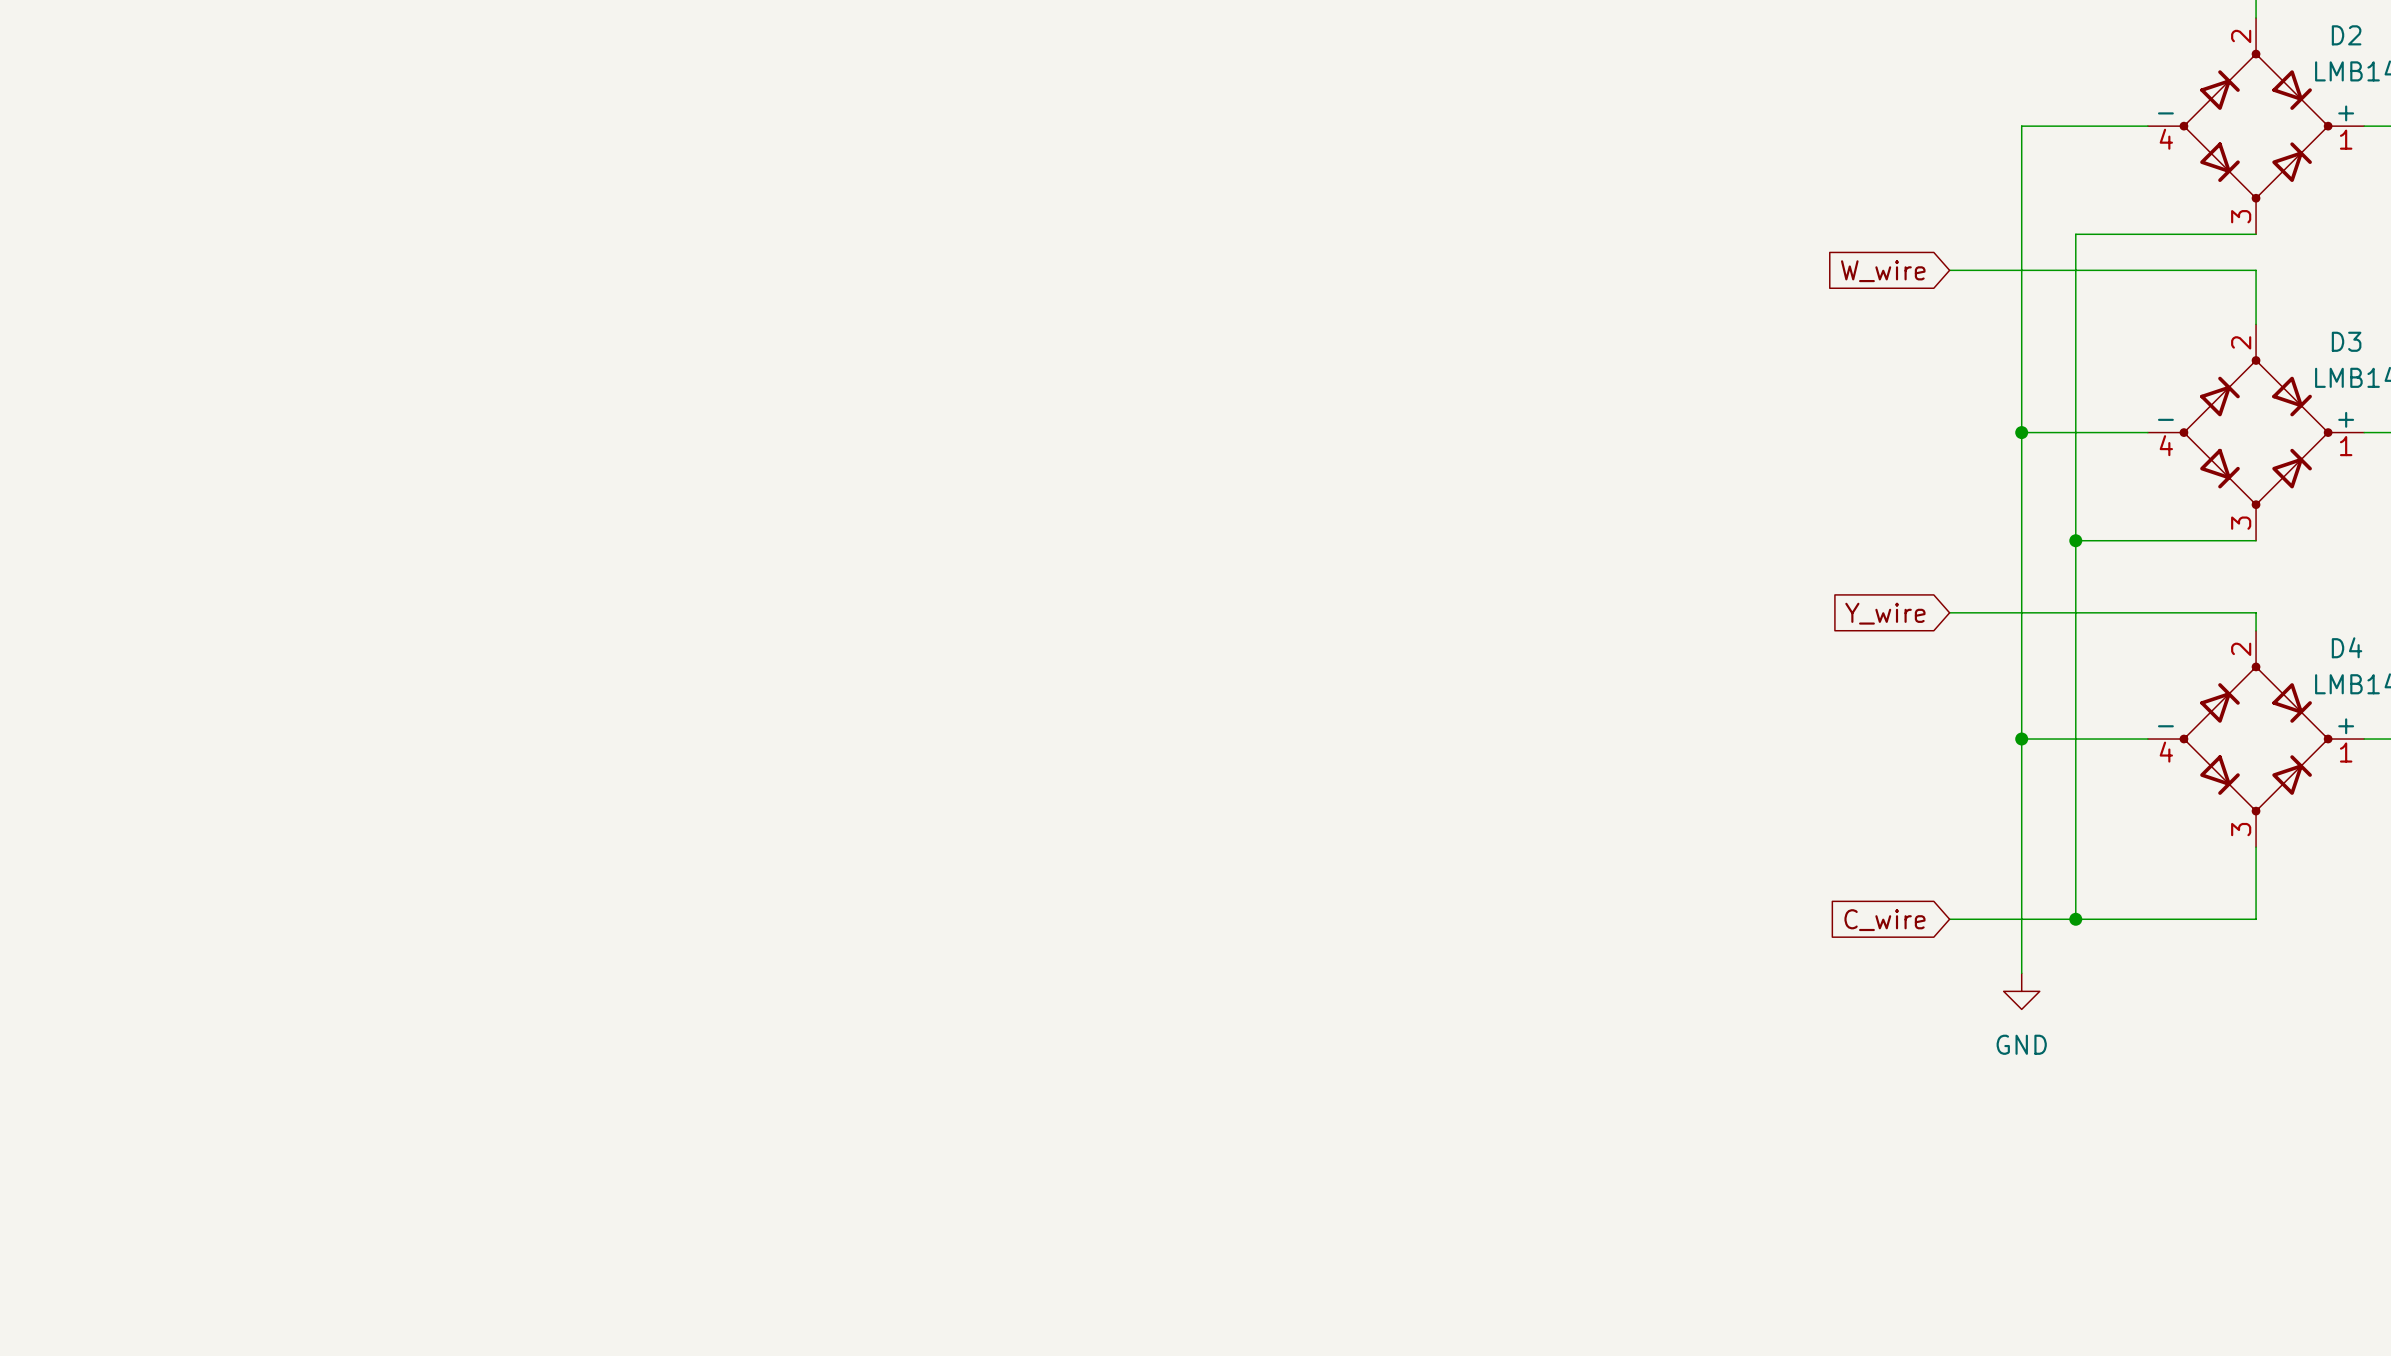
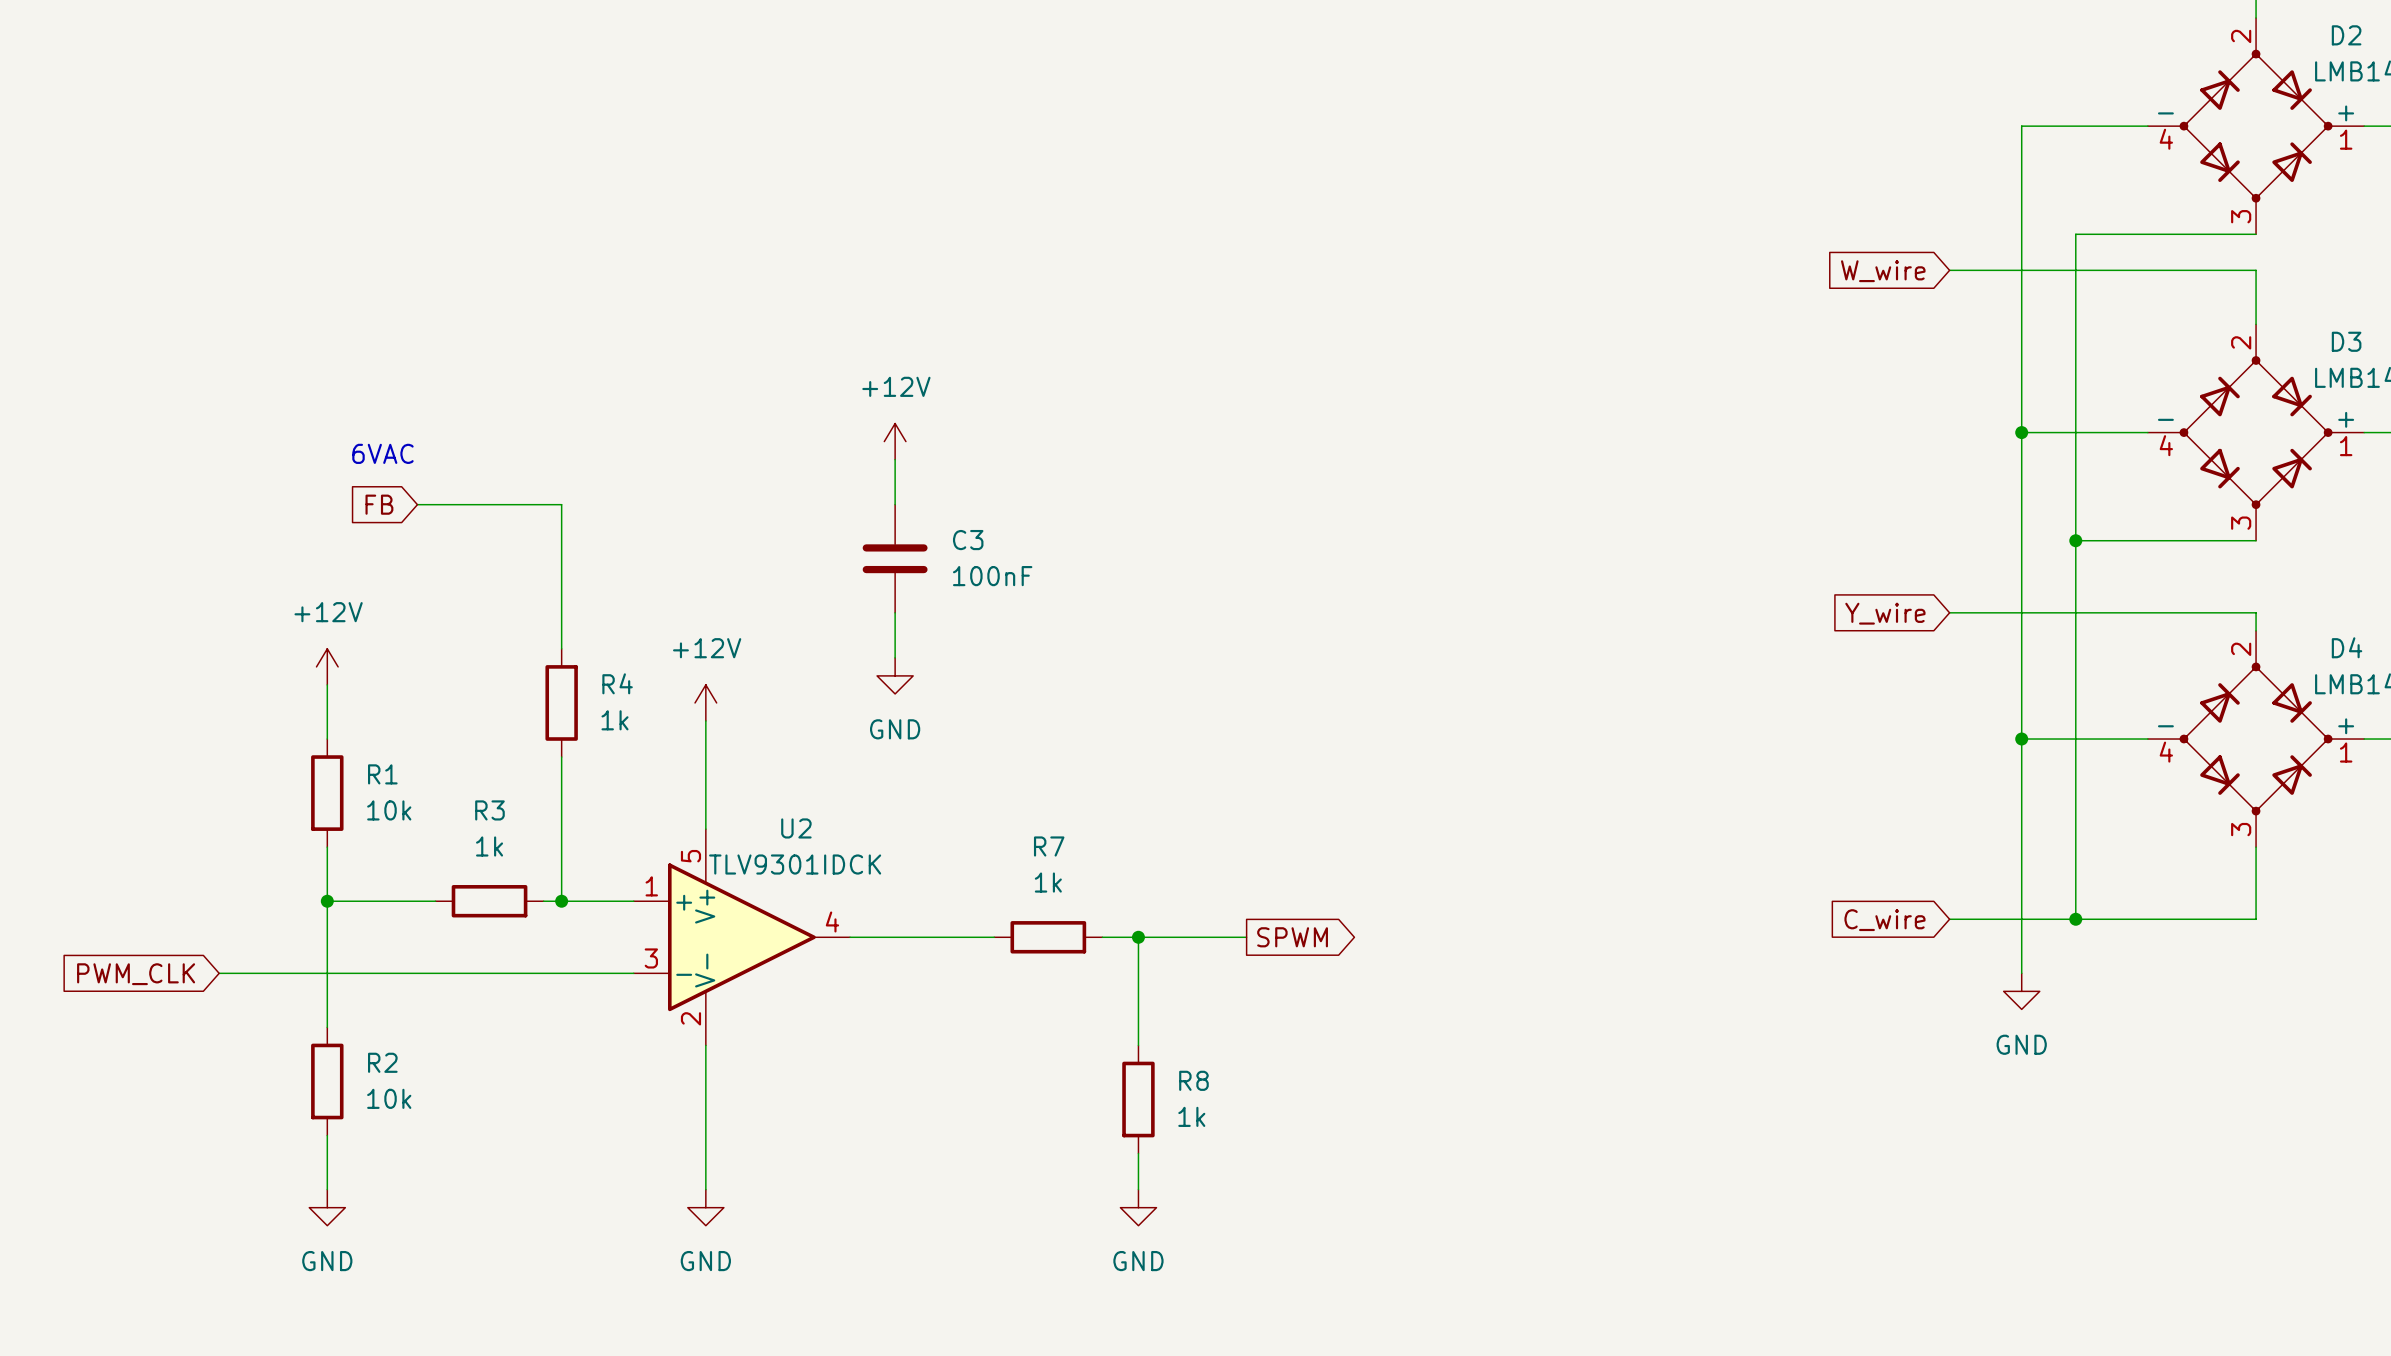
power symbol: none -> +12V (895, 441)
text: none -> 6VAC (382, 453)
wire: none -> (895, 459) (895, 504)
global label: none -> FB (379, 504)
wire: none -> (417, 504) (561, 504) (561, 648)
C3: none -> 100nF (895, 558)
wire: none -> (895, 612) (895, 657)
power symbol: none -> +12V (327, 666)
power symbol: none -> GND (895, 675)
wire: none -> (327, 684) (327, 739)
R4: none -> 1k (561, 702)
power symbol: none -> +12V (705, 702)
wire: none -> (705, 720) (705, 829)
wire: none -> (561, 757) (561, 901)
R1: none -> 10k (327, 793)
wire: none -> (327, 847) (327, 1027)
wire: none -> (327, 901) (435, 901)
junction: none -> (327, 901)
R3: none -> 1k (489, 901)
wire: none -> (543, 901) (633, 901)
junction: none -> (561, 901)
U2: none -> TLV9301IDCK (741, 937)
wire: none -> (850, 937) (994, 937)
R7: none -> 1k (1048, 937)
wire: none -> (1102, 937) (1246, 937)
wire: none -> (1138, 937) (1138, 1045)
junction: none -> (1138, 937)
global label: none -> SPWM (1292, 937)
wire: none -> (219, 973) (633, 973)
global label: none -> PWM_CLK (136, 974)
wire: none -> (705, 1045) (705, 1189)
R2: none -> 10k (327, 1081)
R8: none -> 1k (1138, 1099)
wire: none -> (327, 1135) (327, 1189)
wire: none -> (1138, 1153) (1138, 1189)
power symbol: none -> GND (327, 1207)
power symbol: none -> GND (705, 1207)
power symbol: none -> GND (1138, 1207)

